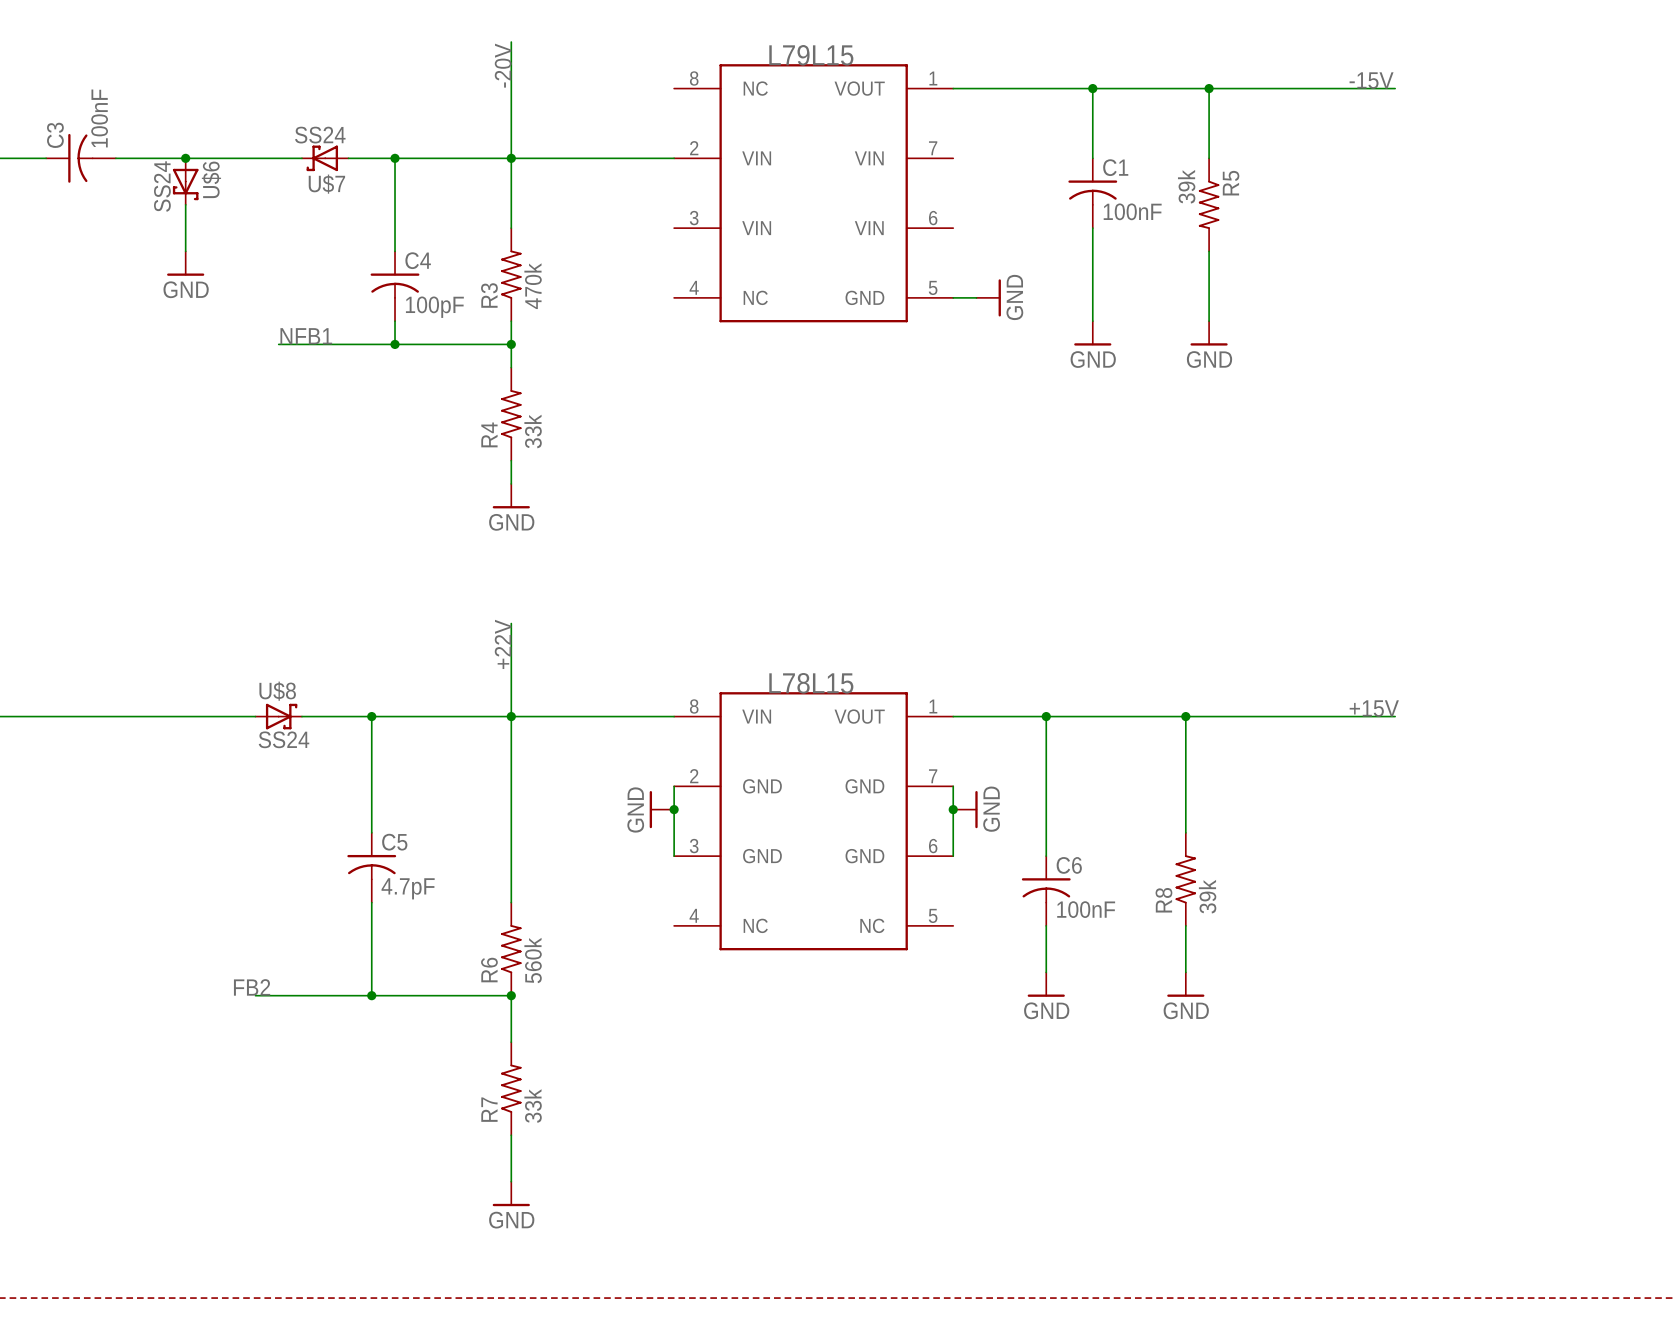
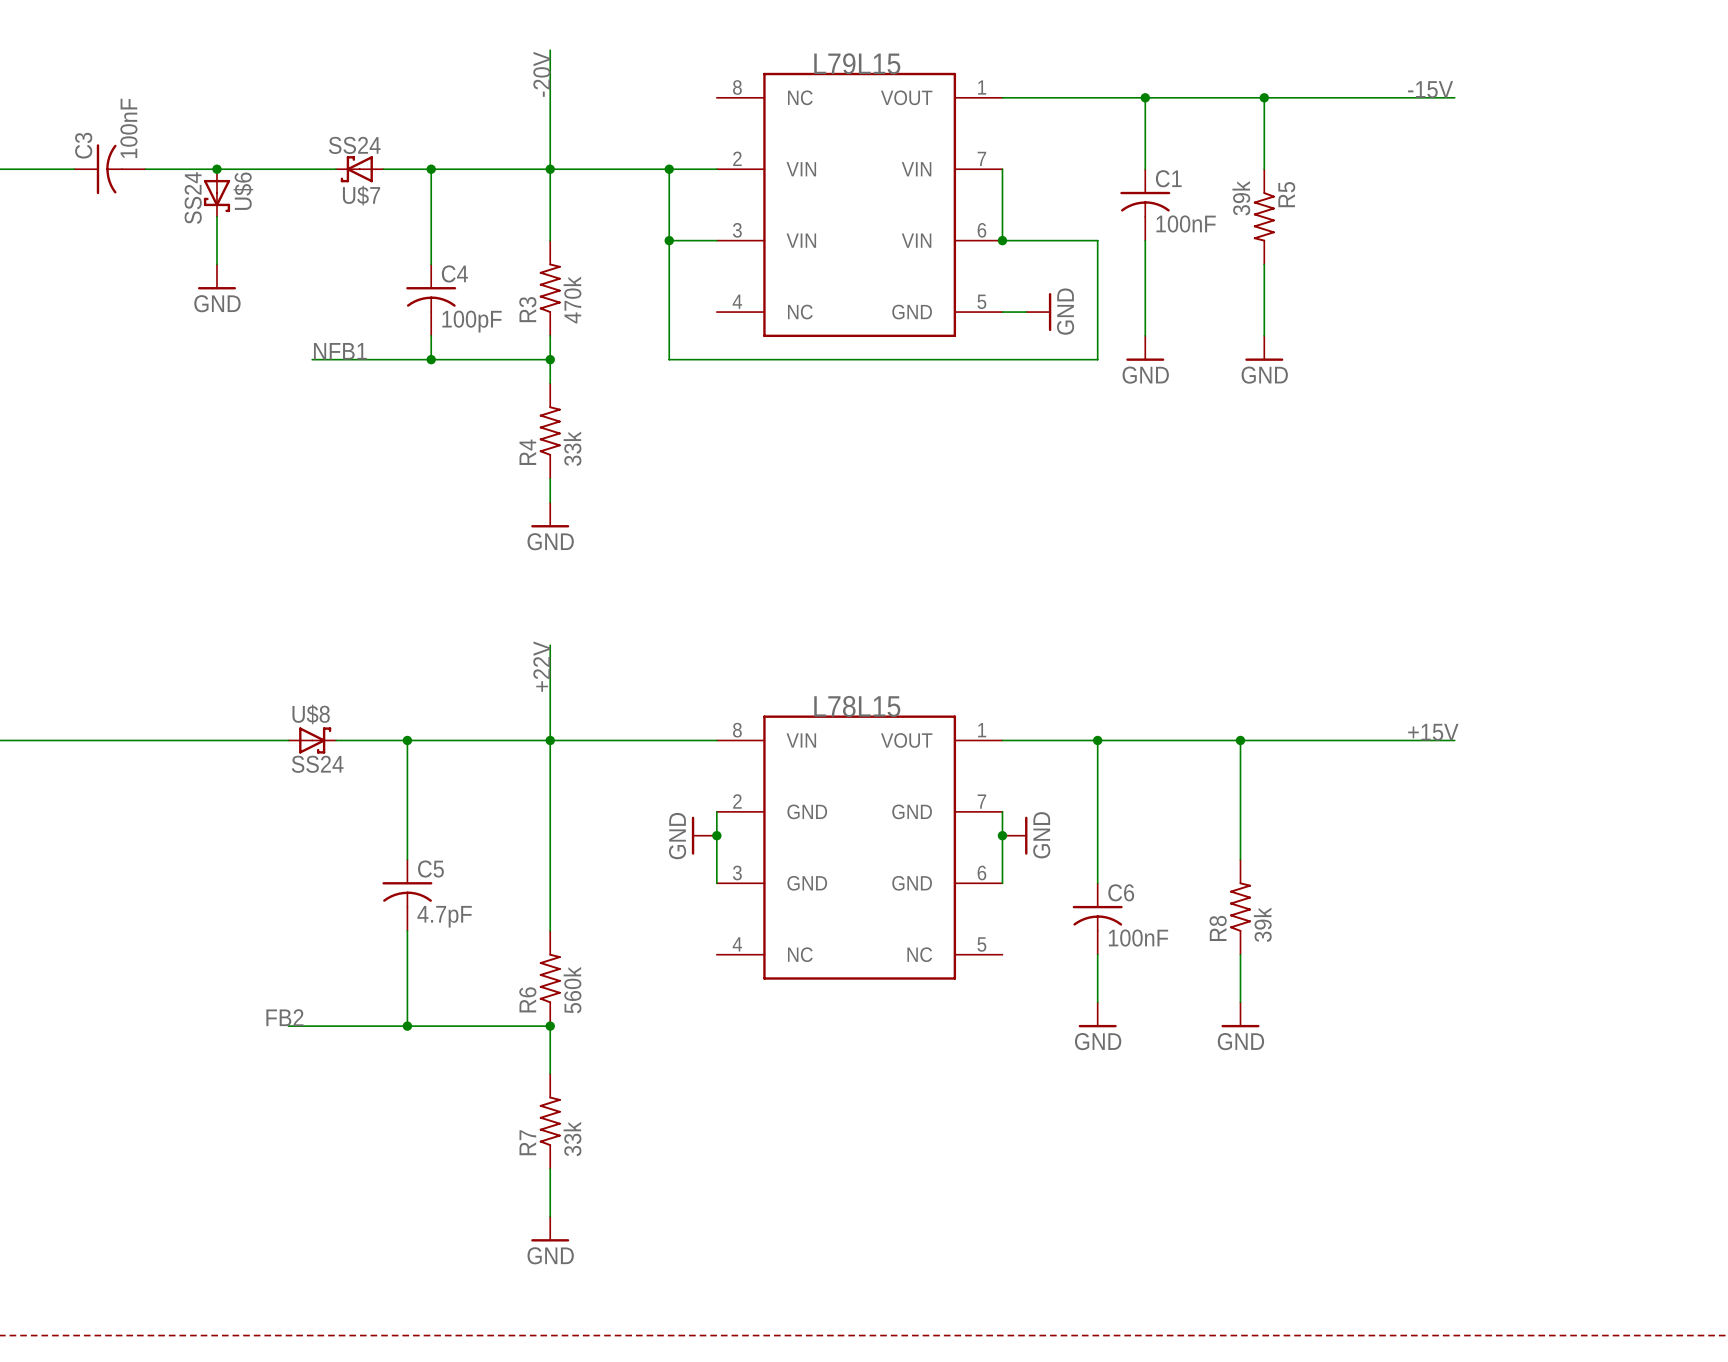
wire: none -> (669, 169) (669, 359) (1097, 359) (1097, 240) (1002, 240) (1002, 169)
junction: none -> (669, 169)
wire: none -> (669, 240) (716, 240)
junction: none -> (669, 240)
junction: none -> (1002, 240)

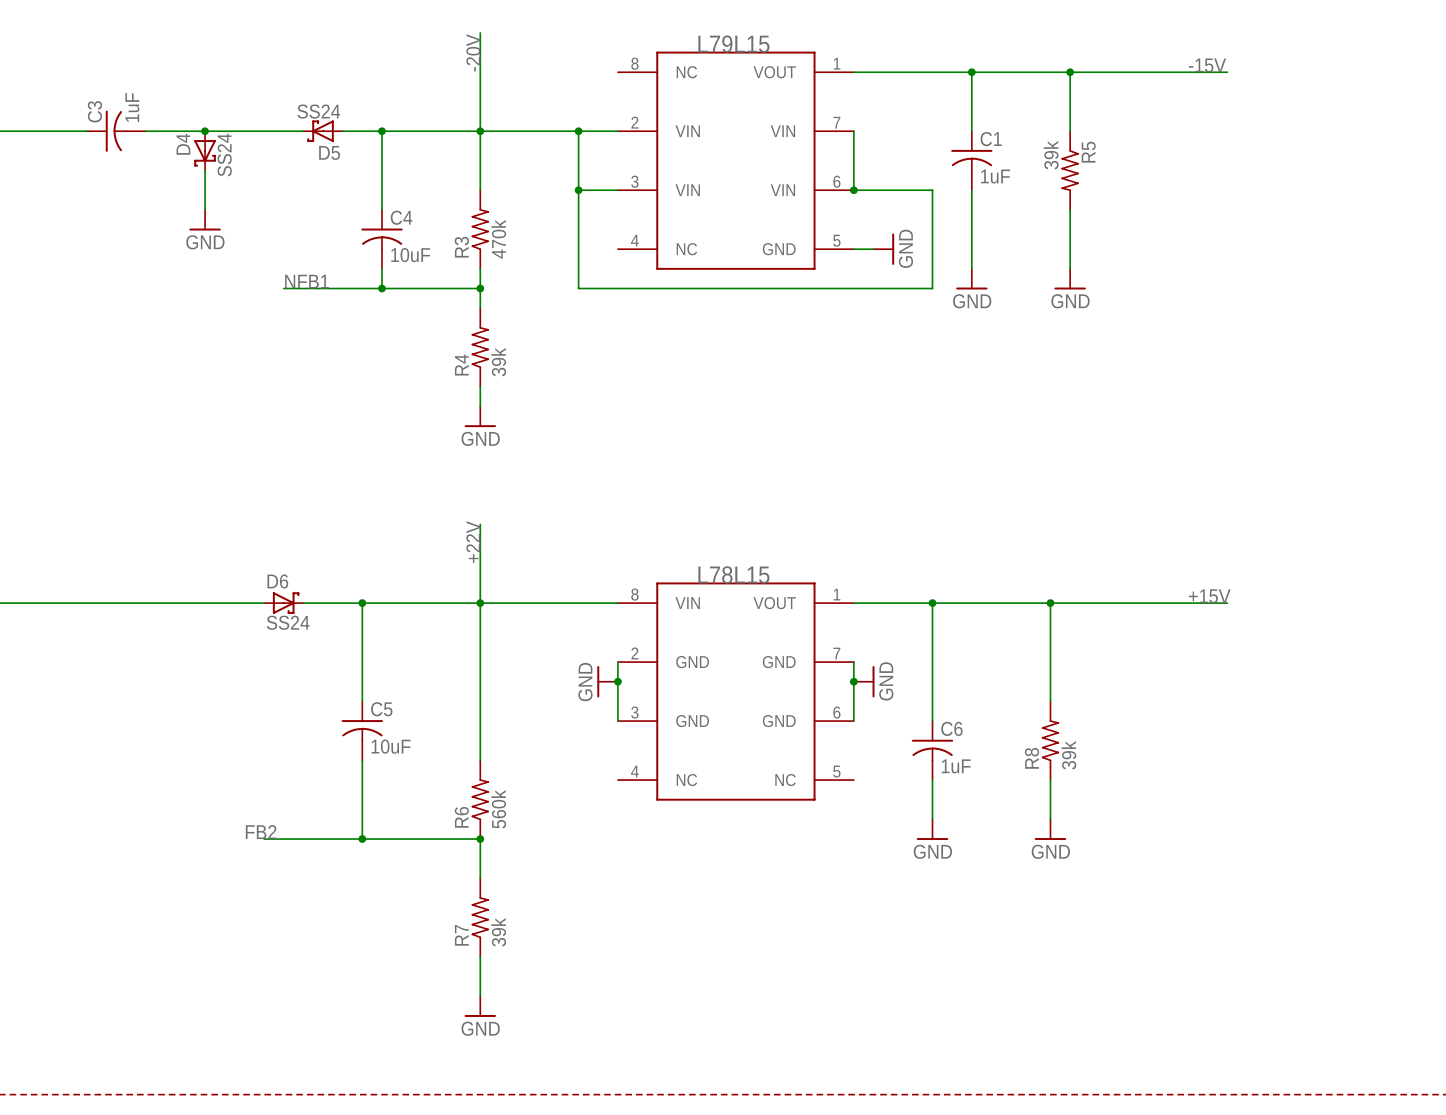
C3 value: 100nF (128, 128) -> 1uF (132, 107)
U$6: SS24 (216, 193) -> none
D4: none -> SS24 (205, 150)
U$7 name: U$7 (361, 195) -> D5 (329, 152)
C1 value: 100nF (1186, 223) -> 1uF (995, 176)
C4 value: 100pF (472, 321) -> 10uF (410, 255)
R4 value: 33k (572, 448) -> 39k (498, 362)
U$8 name: U$8 (311, 714) -> D6 (277, 581)
C5 value: 4.7pF (444, 916) -> 10uF (391, 746)
C6 value: 100nF (1138, 938) -> 1uF (956, 766)
R7 value: 33k (572, 1139) -> 39k (498, 932)

